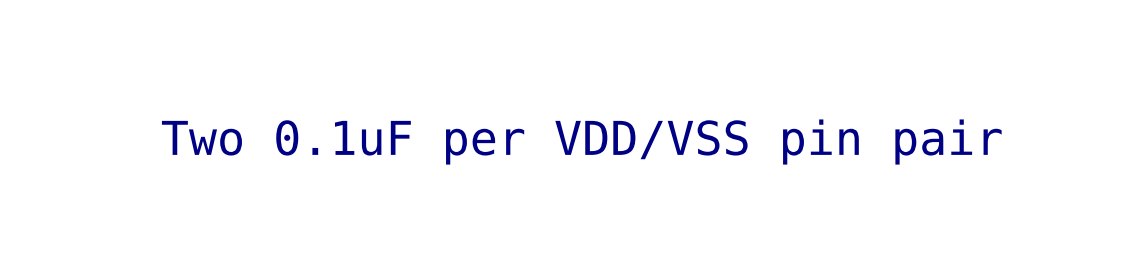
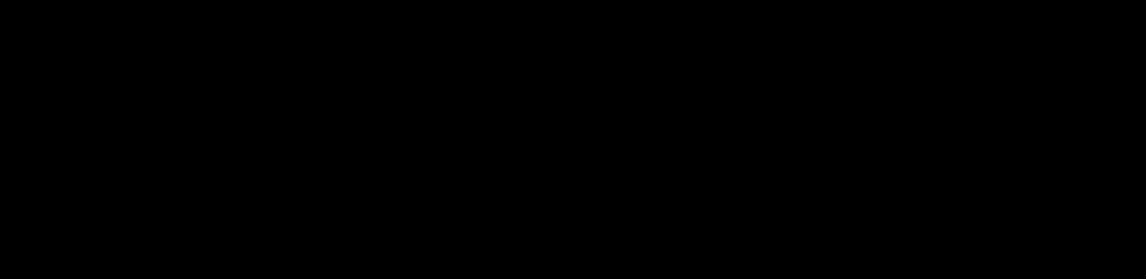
text: Two 0.1uF per VDD/VSS pin pair (581, 142) -> none

